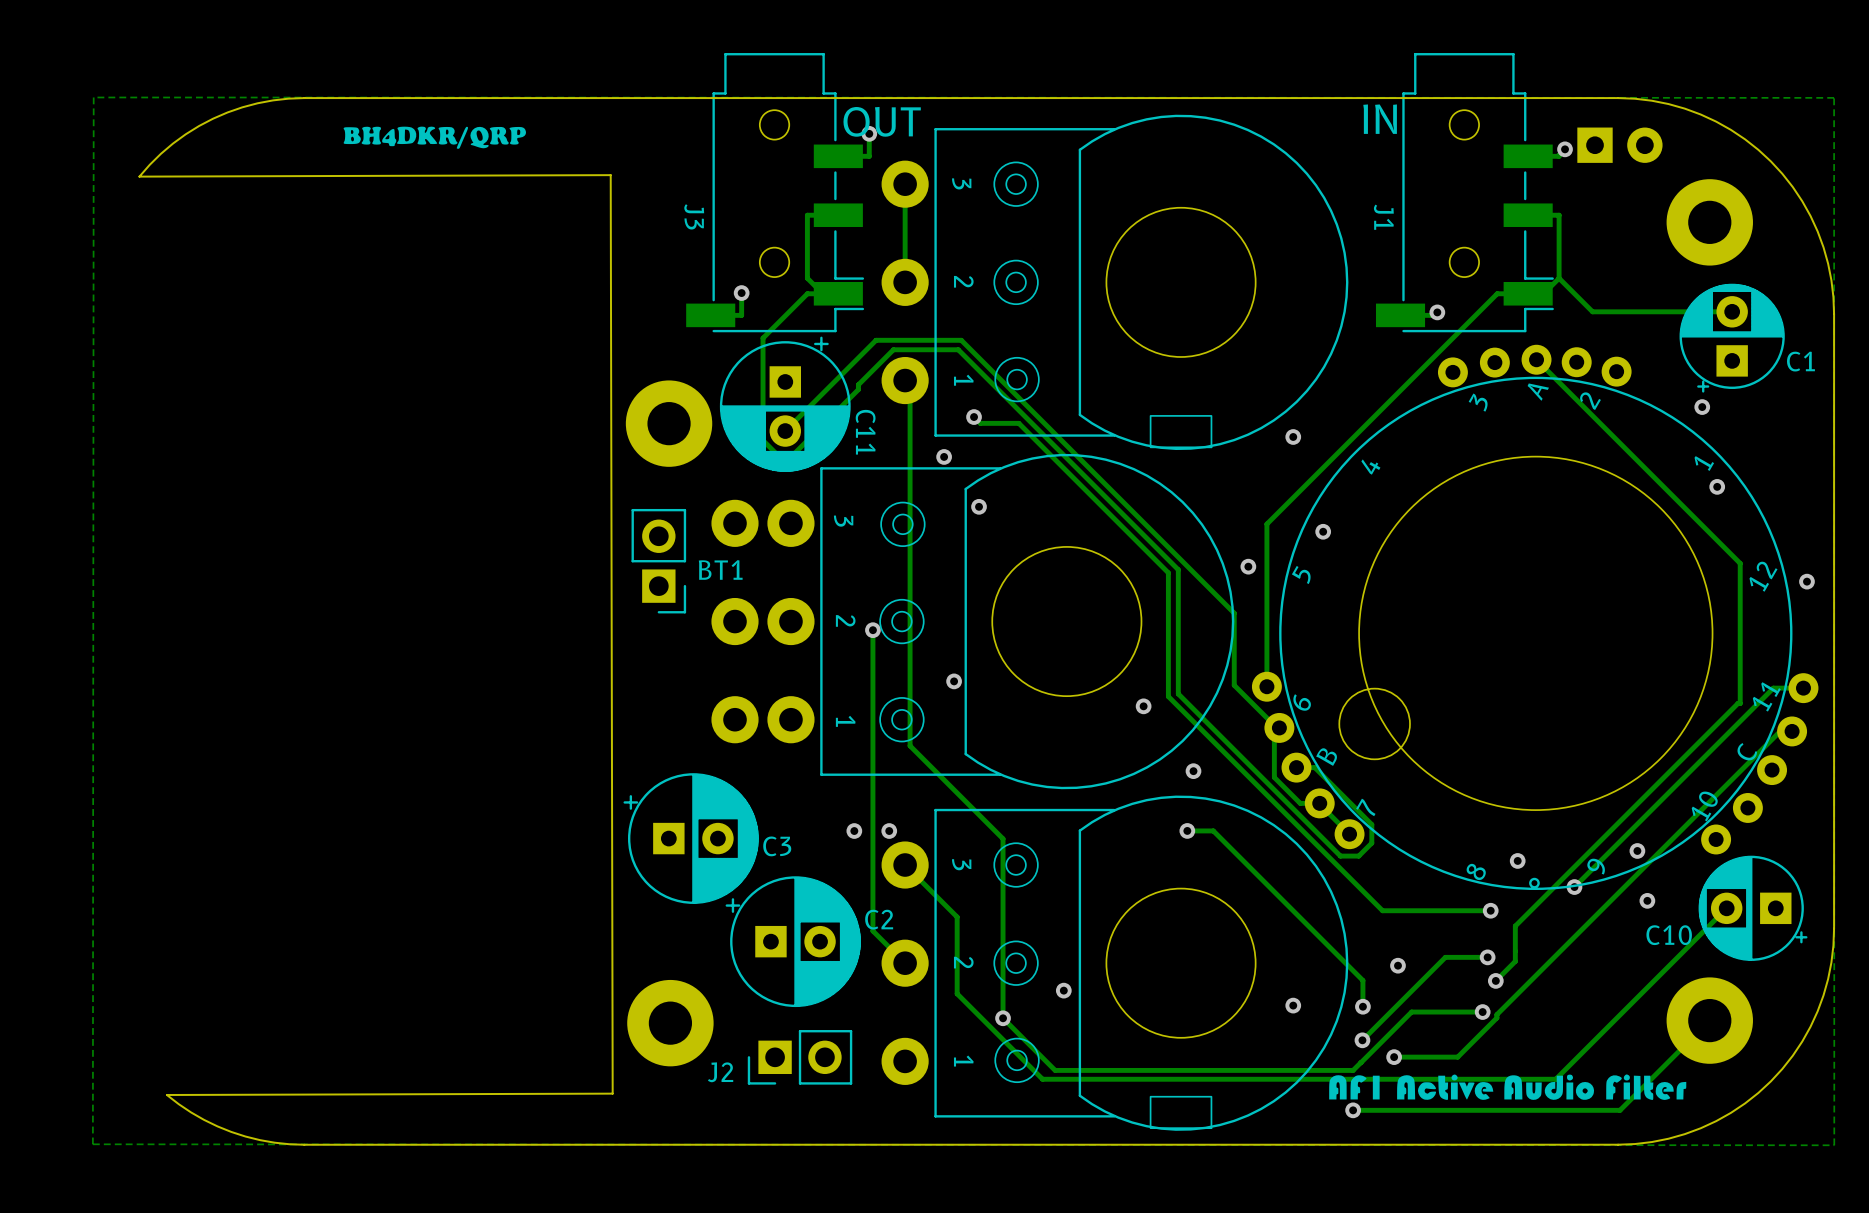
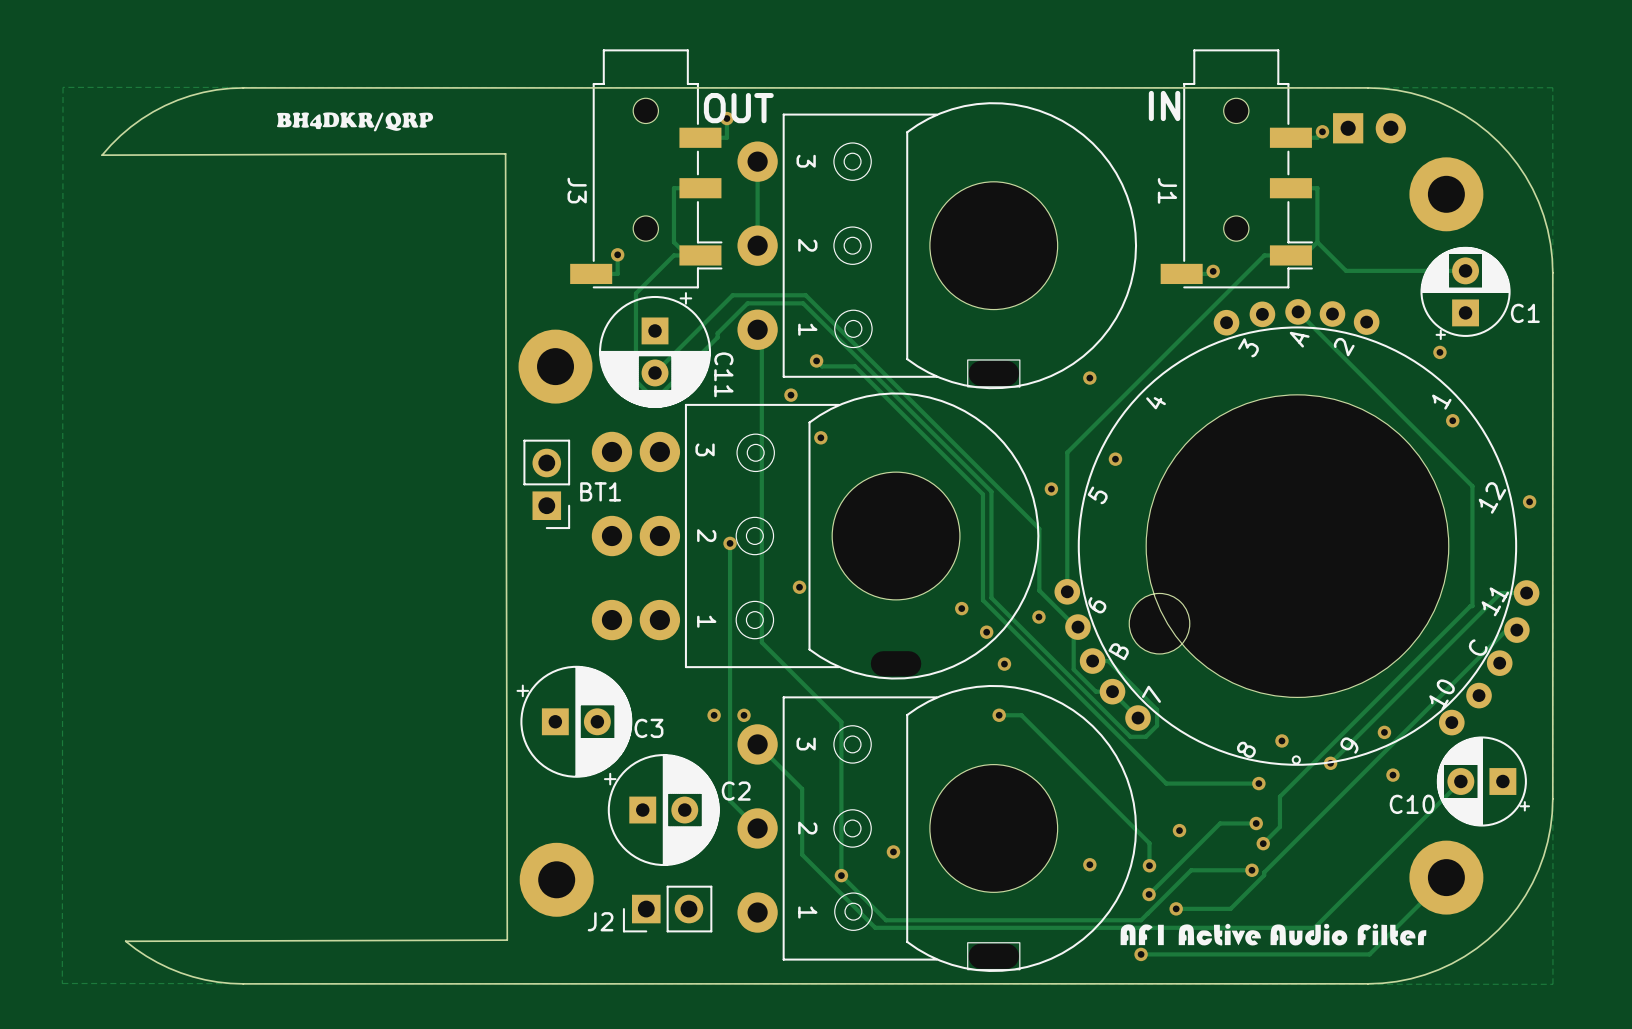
via: none -> (1038, 617)
via: none -> (986, 632)

